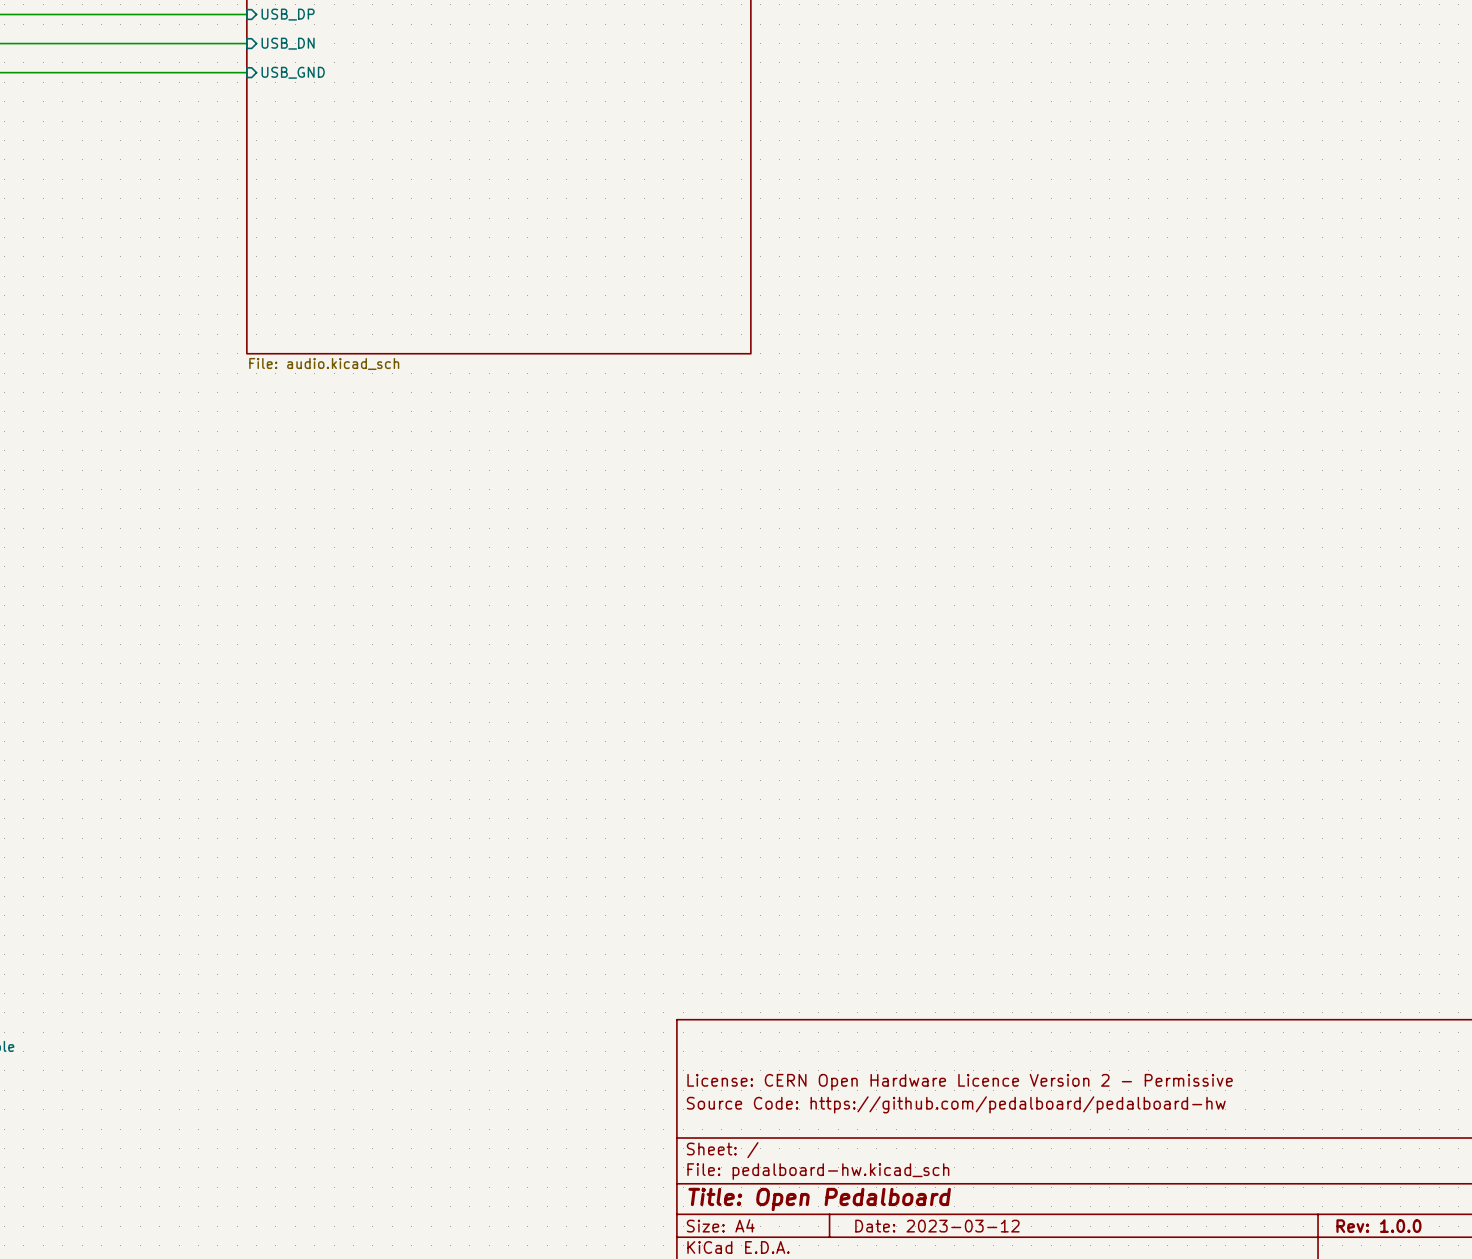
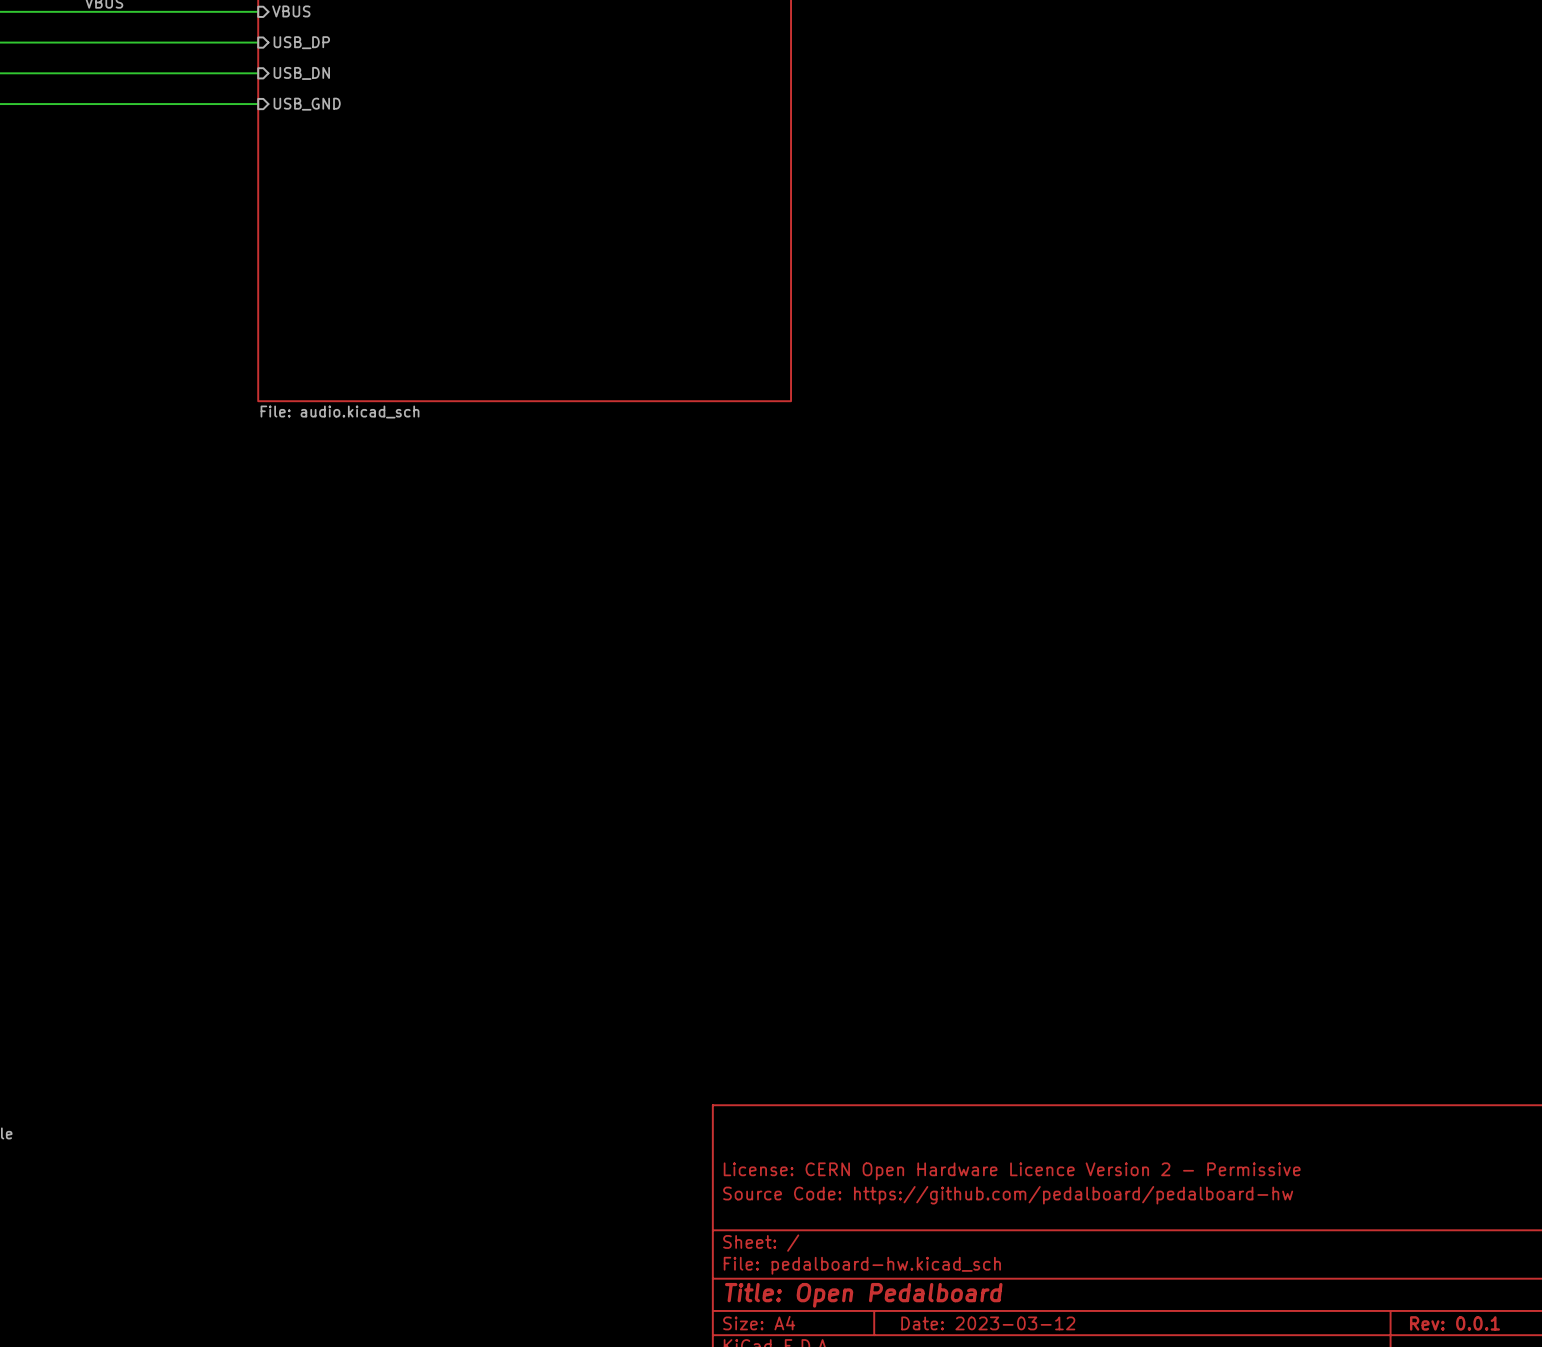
title block: Rev: 1.0.0 (1378, 1226) -> Rev: 0.0.1 (1454, 1323)

